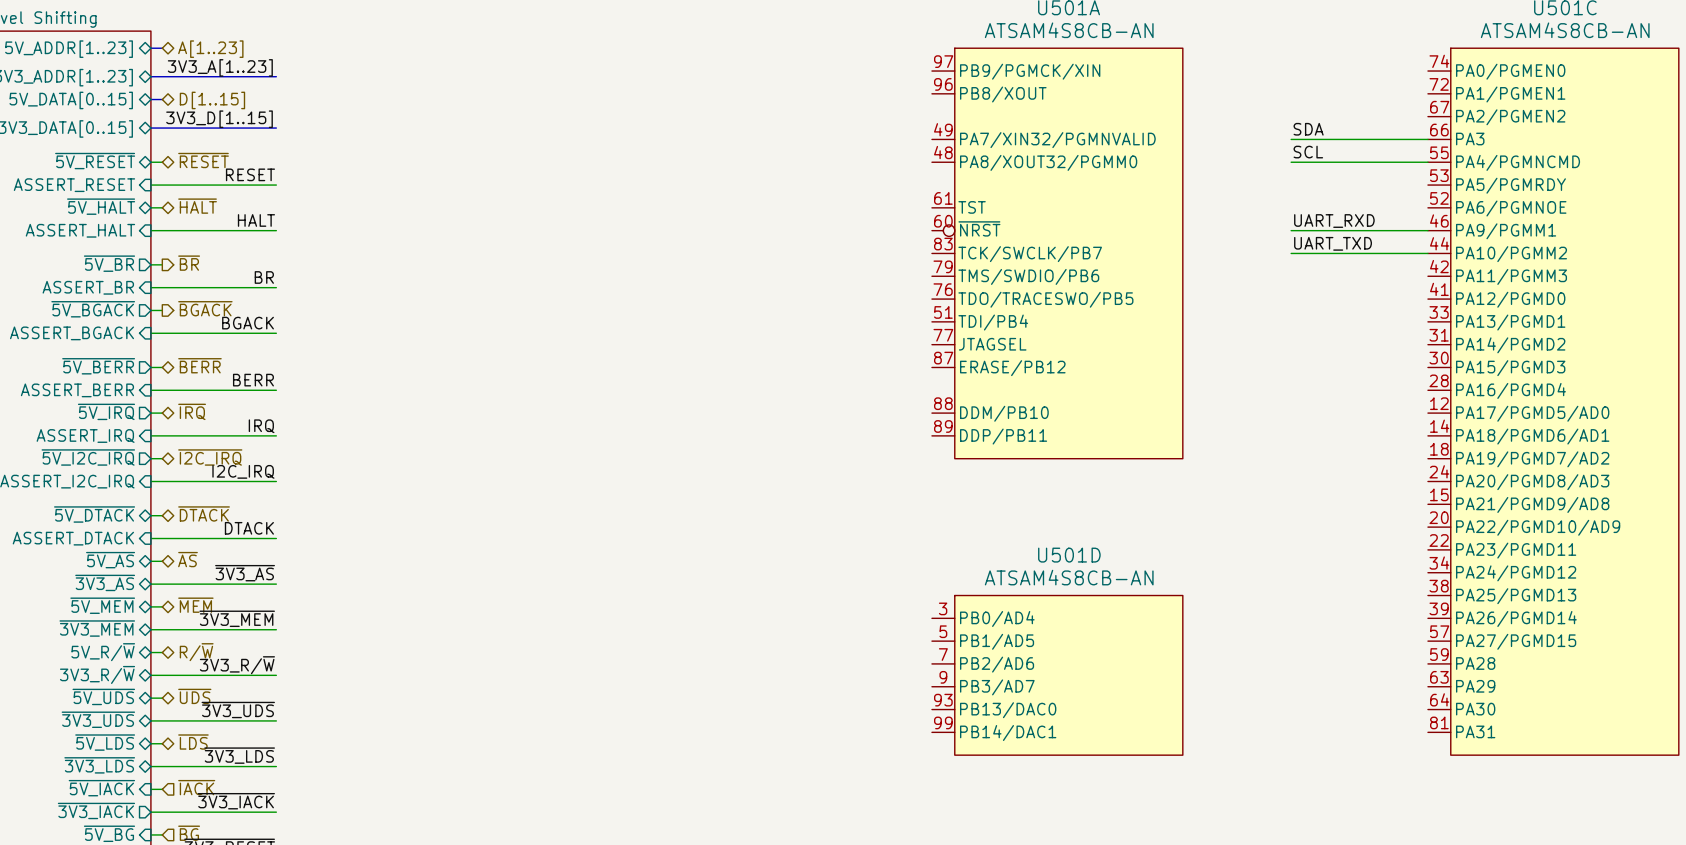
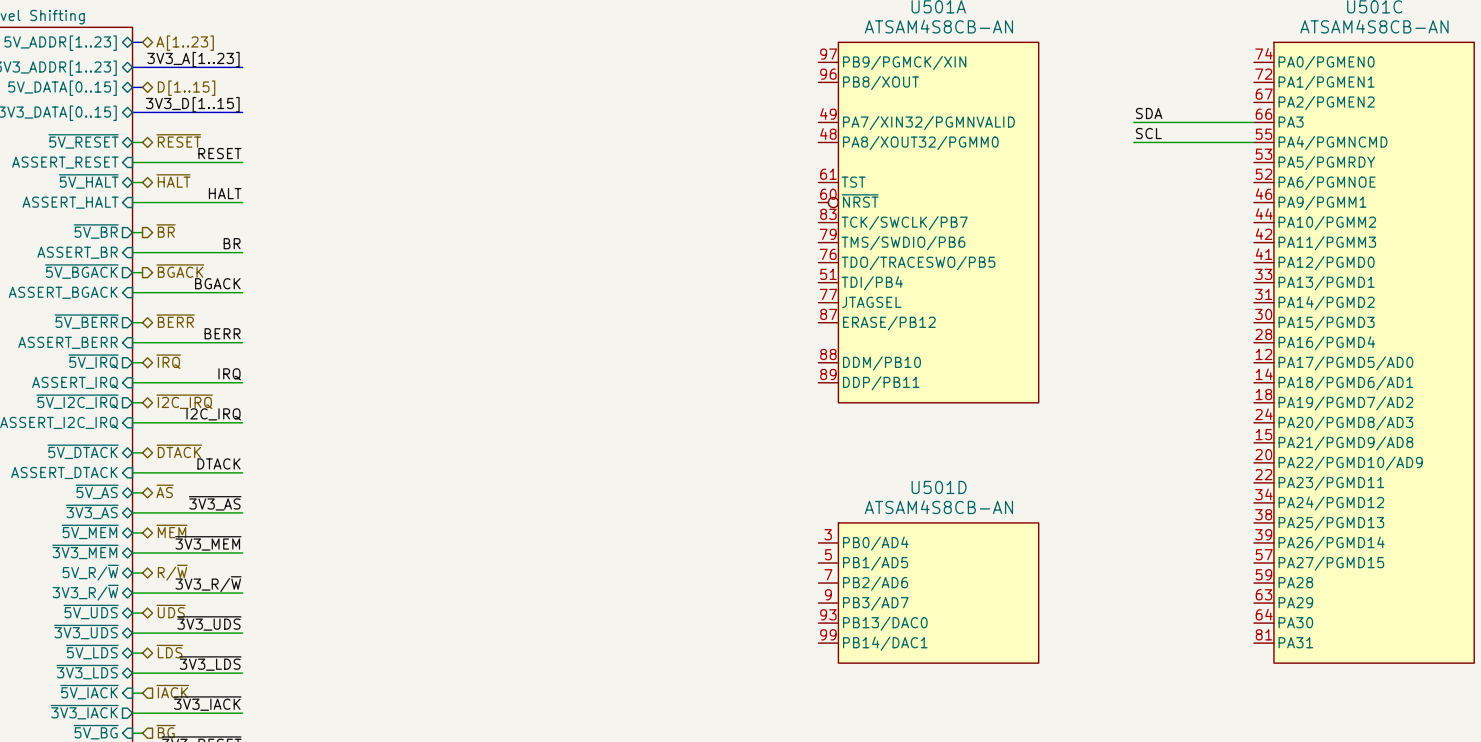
label: UART_RXD (1334, 221) -> none
wire: (1291, 230) (1427, 230) -> none
label: UART_TXD (1333, 243) -> none
wire: (1291, 253) (1427, 253) -> none

